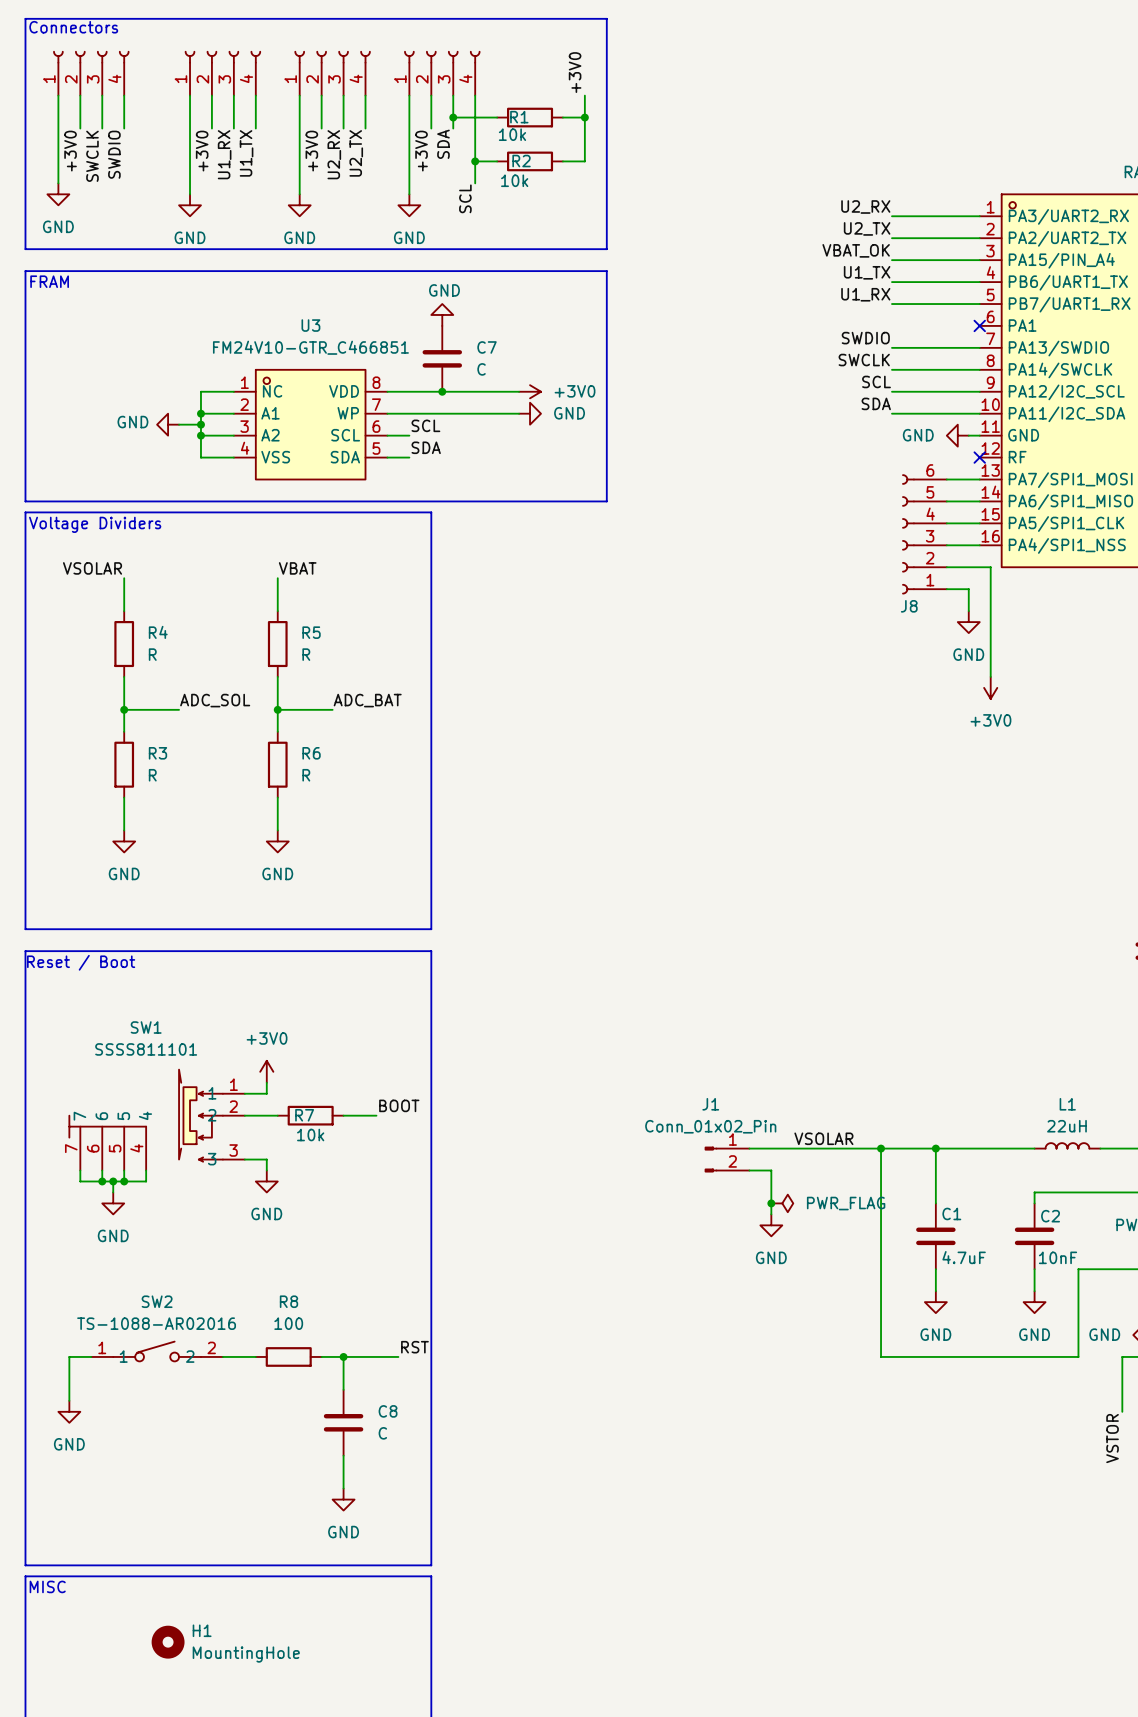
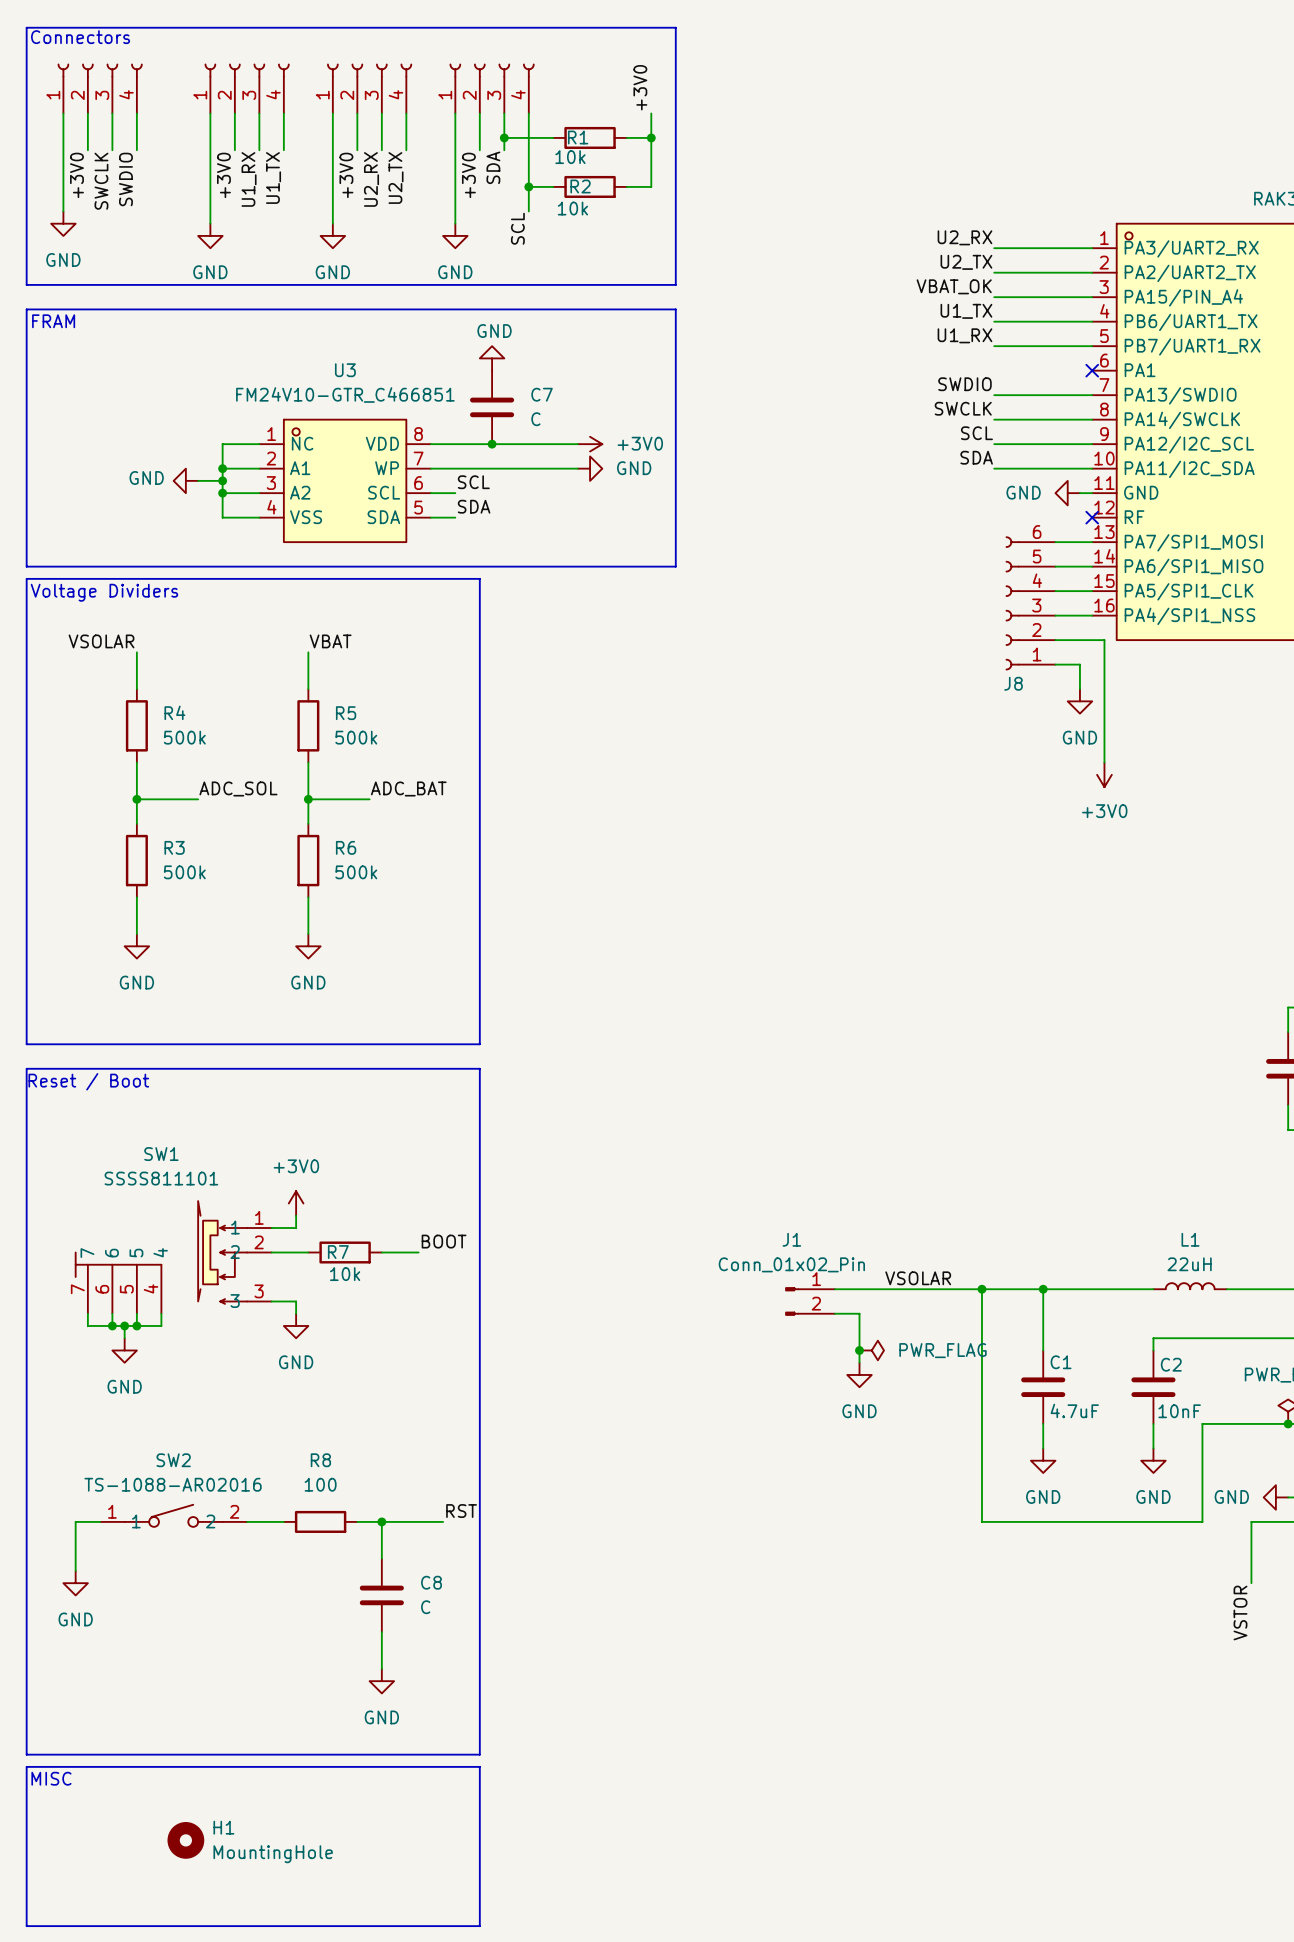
R4 value: R (152, 654) -> 500k (184, 737)
R5 value: R (306, 654) -> 500k (356, 737)
R3 value: R (152, 775) -> 500k (184, 872)
R6 value: R (306, 775) -> 500k (356, 872)

